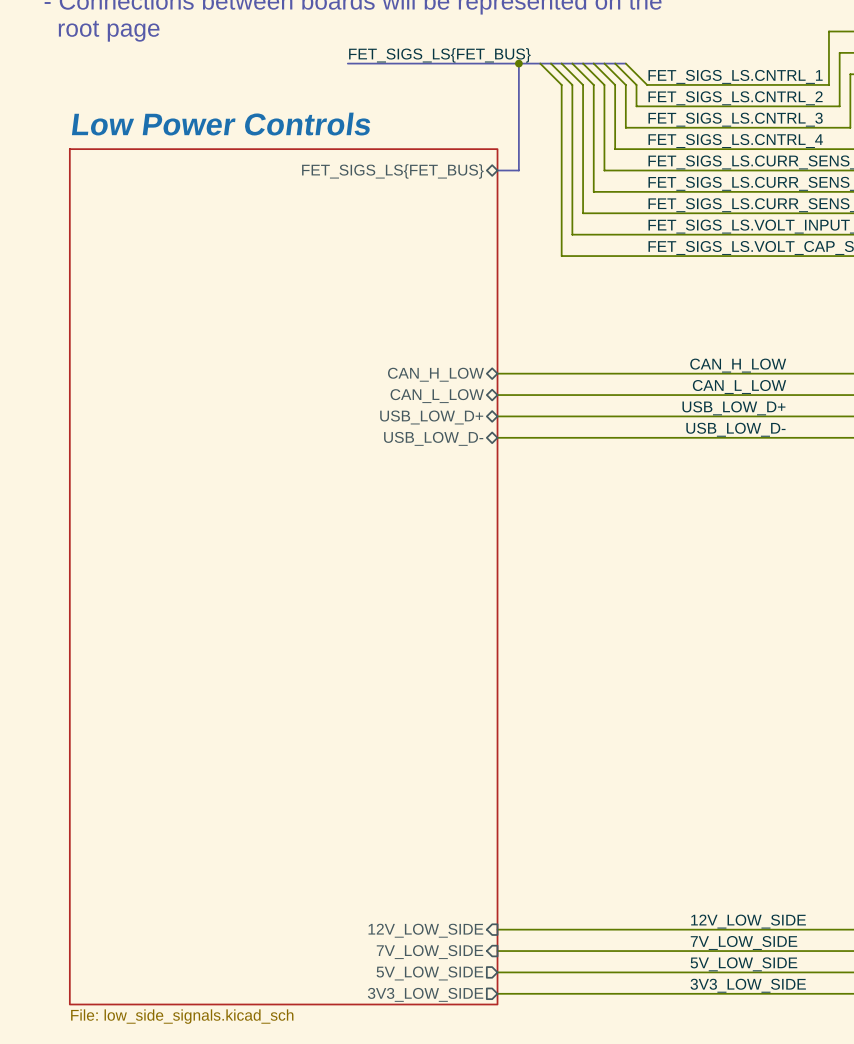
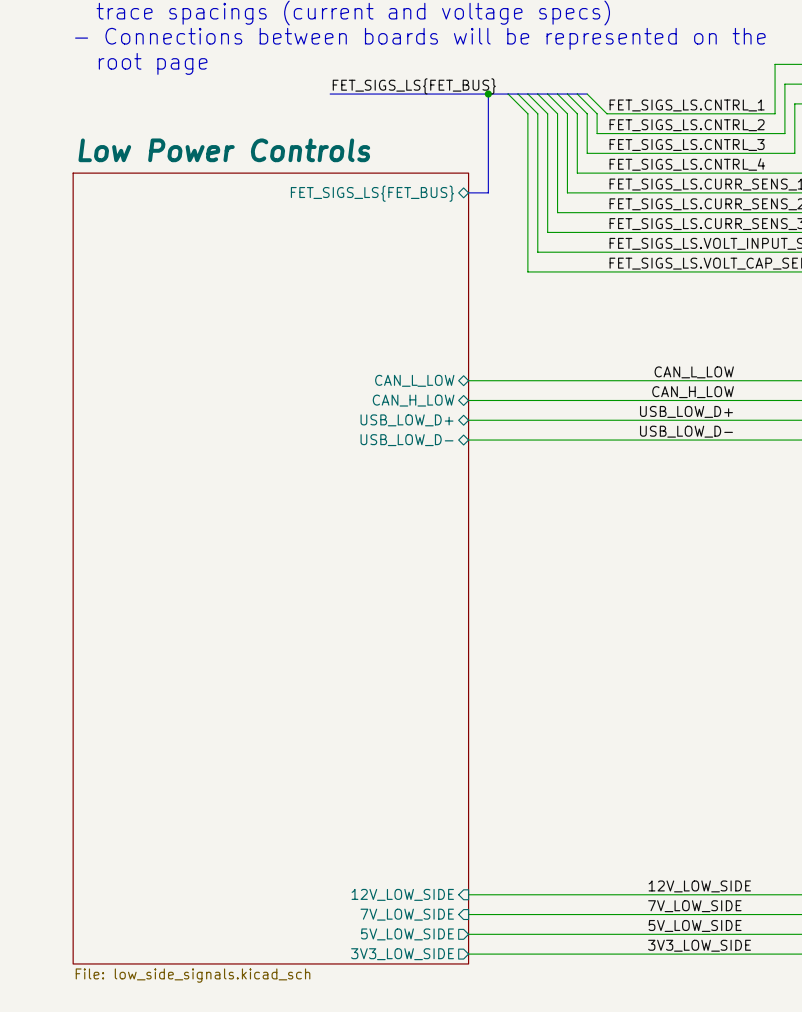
label: CAN_H_LOW (738, 365) -> CAN_L_LOW (694, 372)
sheet pin: CAN_H_LOW (435, 374) -> CAN_L_LOW (414, 380)
label: CAN_L_LOW (739, 386) -> CAN_H_LOW (693, 392)
sheet pin: CAN_L_LOW (437, 396) -> CAN_H_LOW (413, 400)

